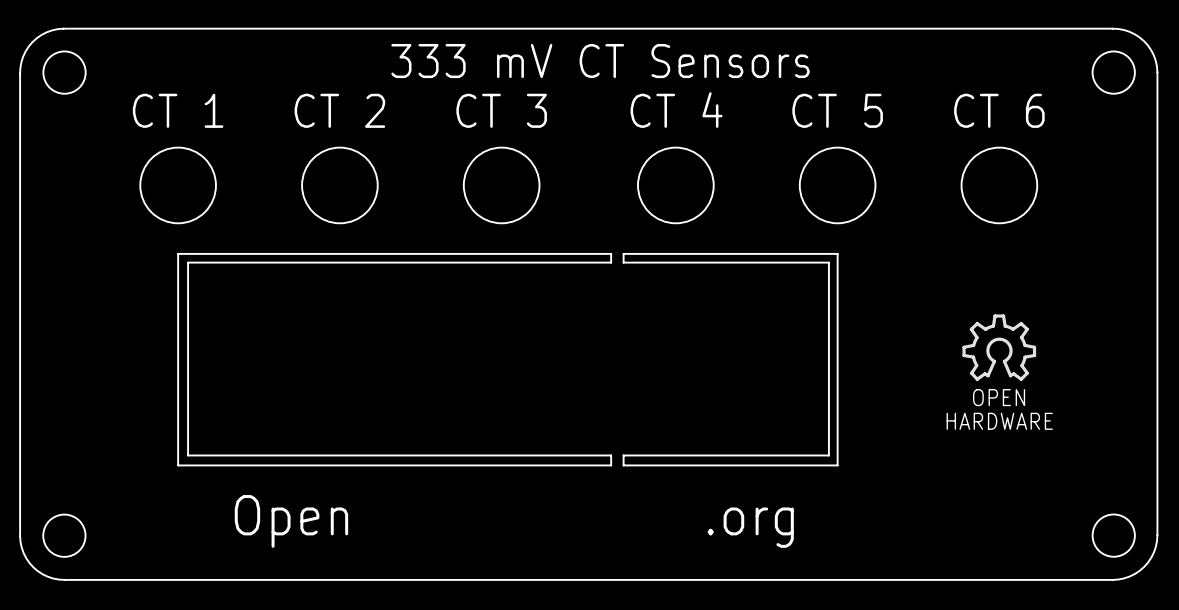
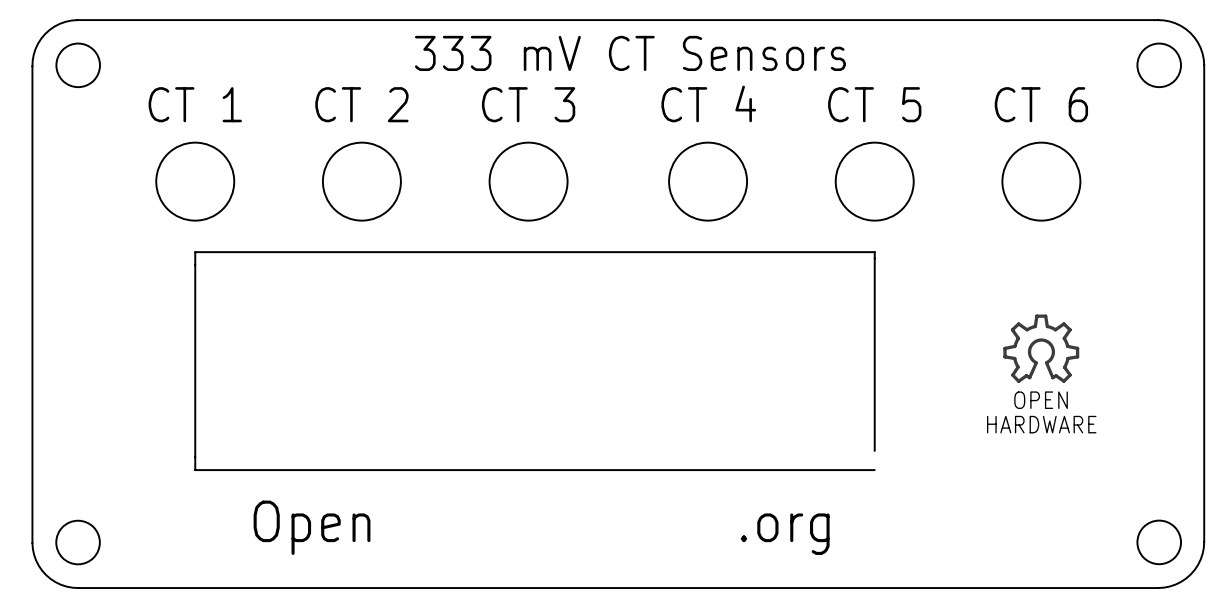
board edge: (611, 253) (611, 262) (188, 262) (188, 455) (611, 455) (611, 465) -> (641, 252) (654, 252)
board edge: (623, 253) (623, 262) (828, 262) (828, 455) (623, 455) (623, 465) -> (641, 470) (654, 470)
board edge: (837, 446) (837, 465) -> none

